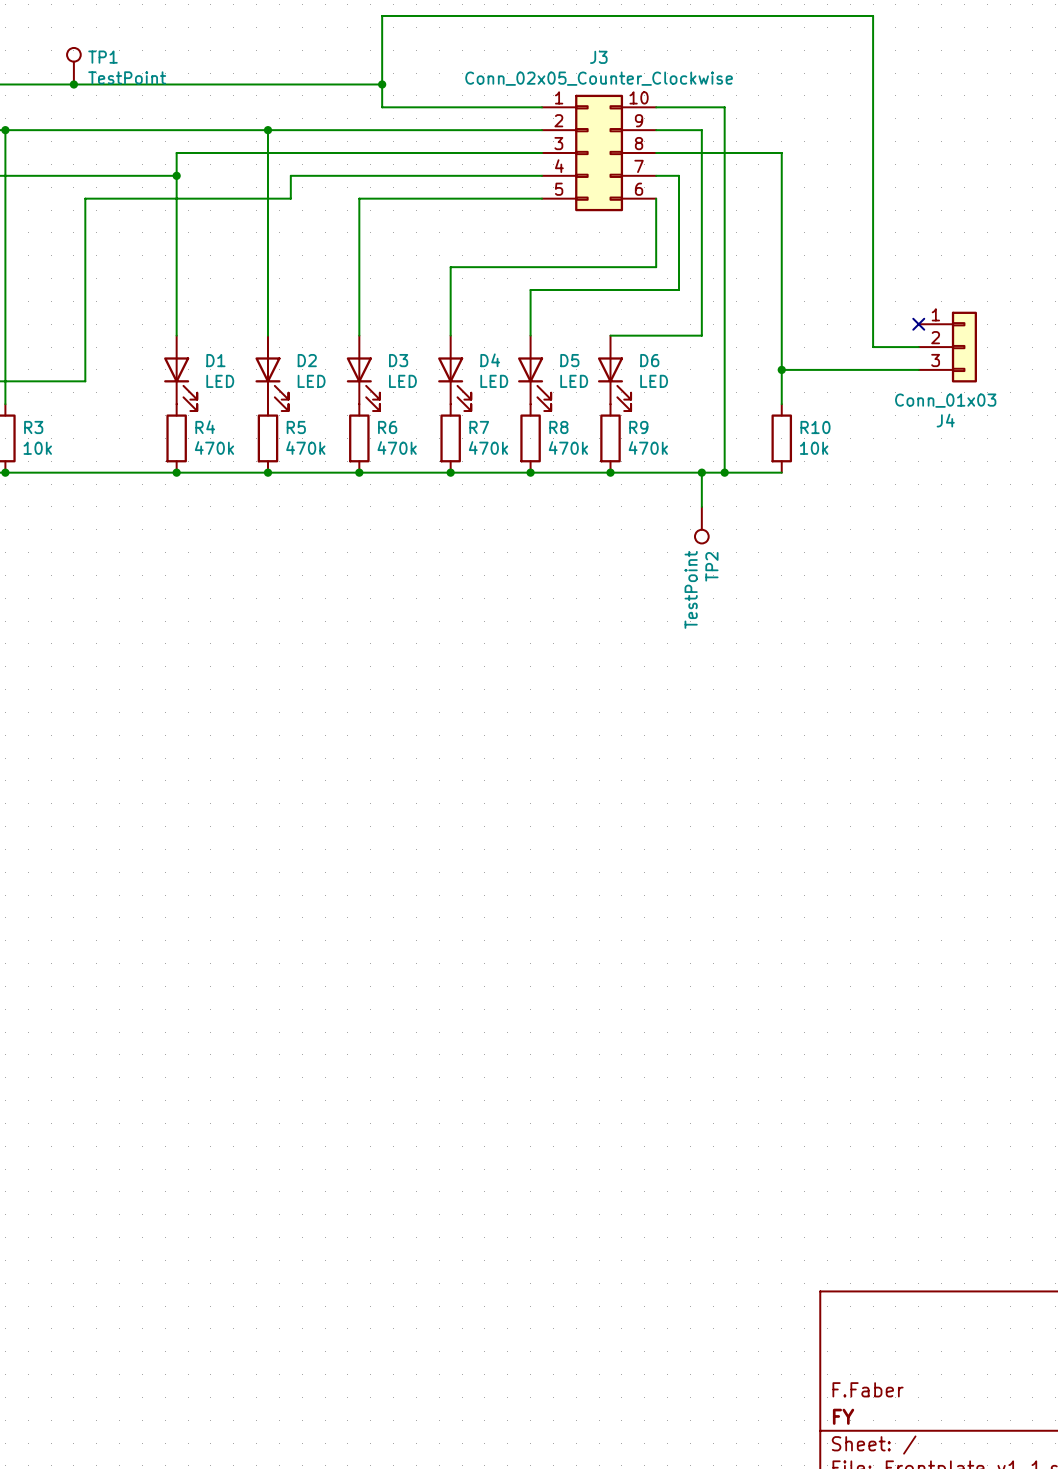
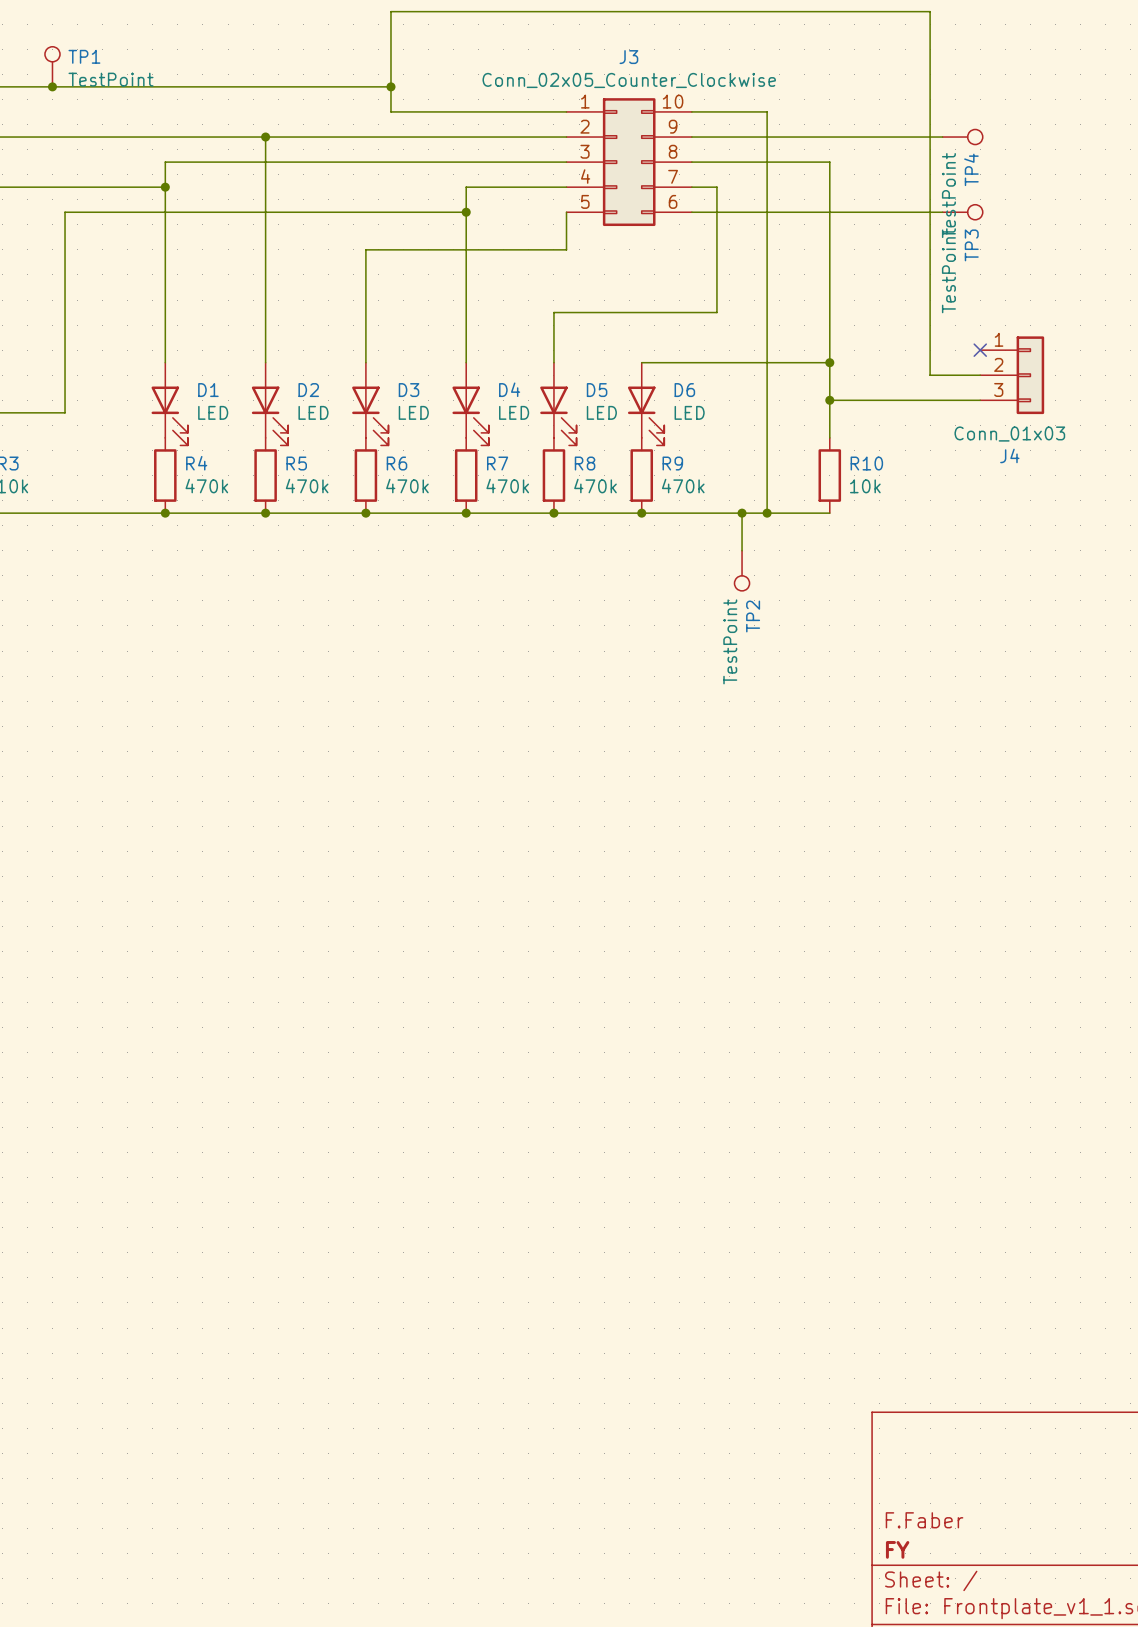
wire: (701, 130) (701, 335) -> (829, 362) (742, 362)
wire: none -> (742, 137) (942, 137)
TP4: none -> TestPoint (962, 137)
wire: (450, 175) (290, 175) (290, 198) -> (466, 187) (466, 287)
wire: (359, 198) (359, 232) -> (365, 212) (290, 212)
wire: (450, 198) (542, 198) -> (365, 249) (566, 249) (566, 212)
junction: none -> (466, 212)
wire: (656, 198) (656, 267) (450, 267) -> (691, 212) (942, 212)
TP3: none -> TestPoint (962, 212)
junction: none -> (829, 362)

